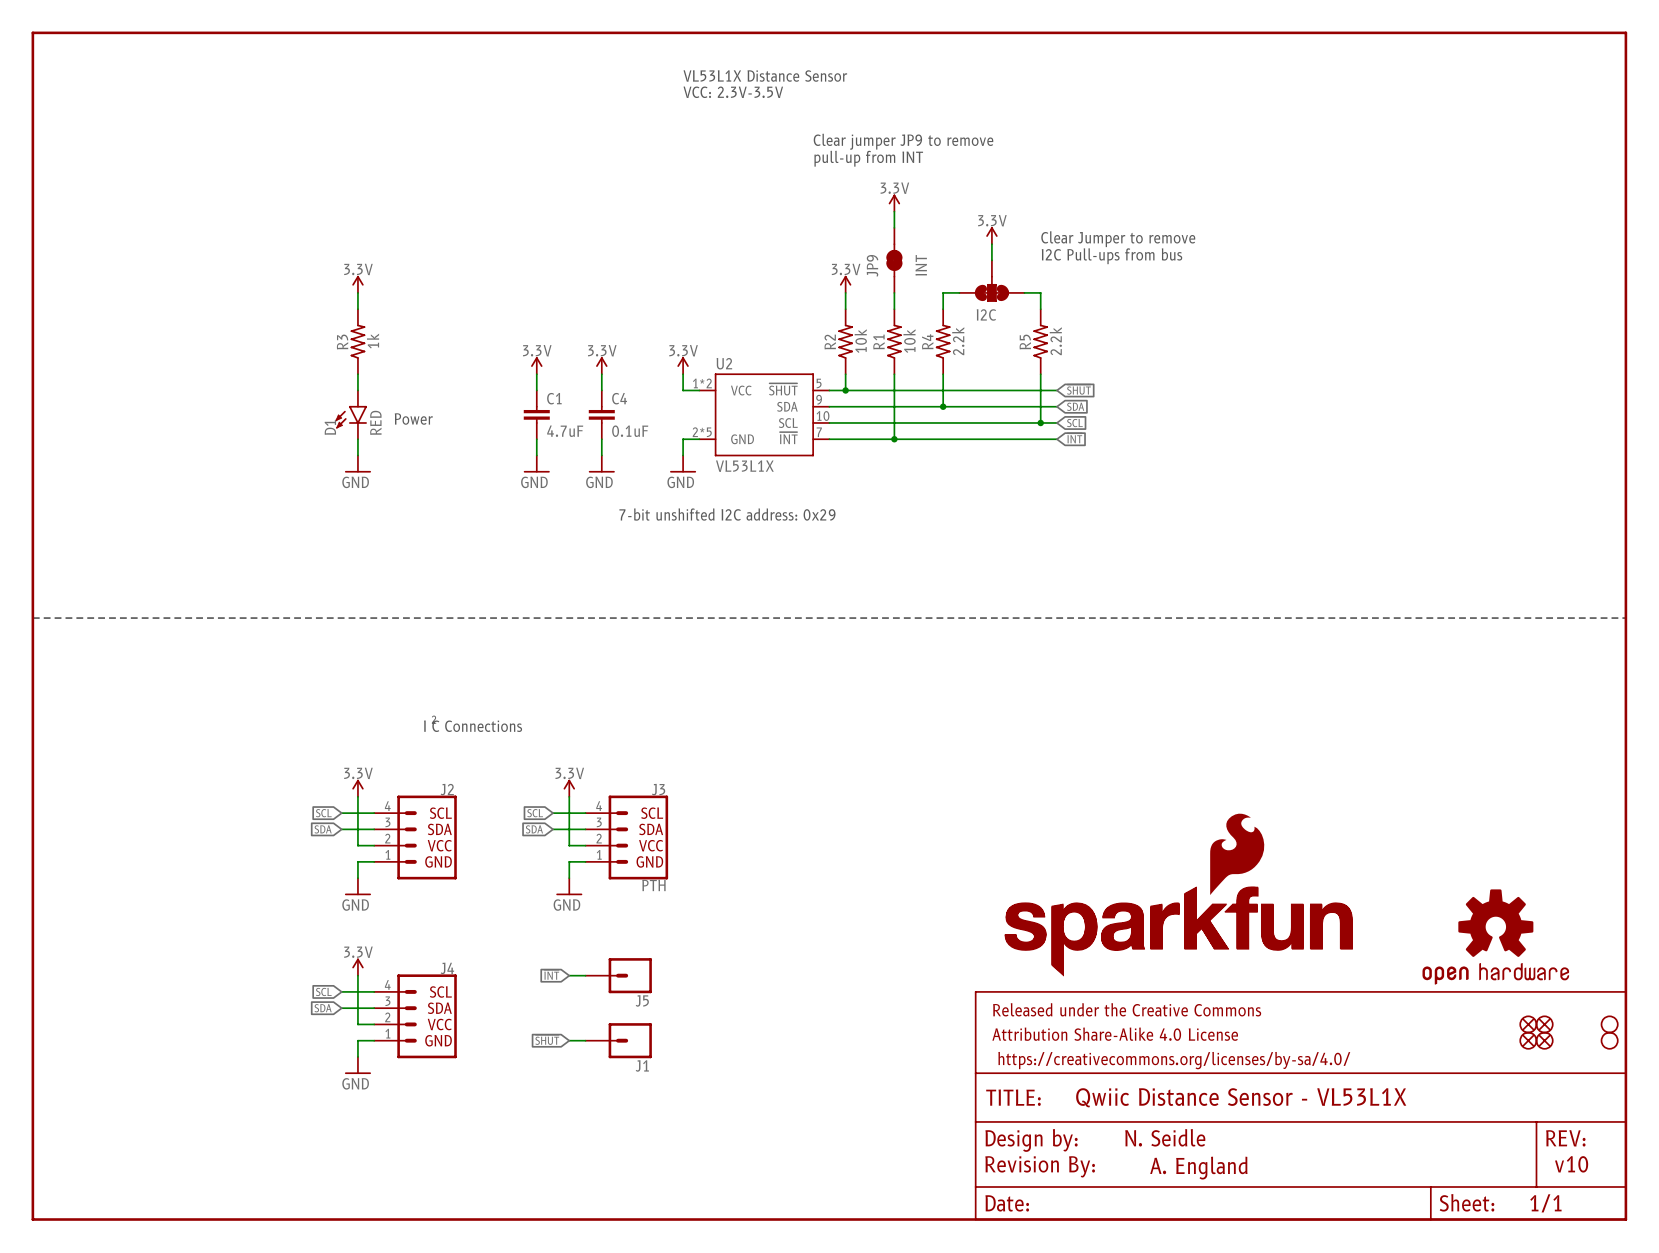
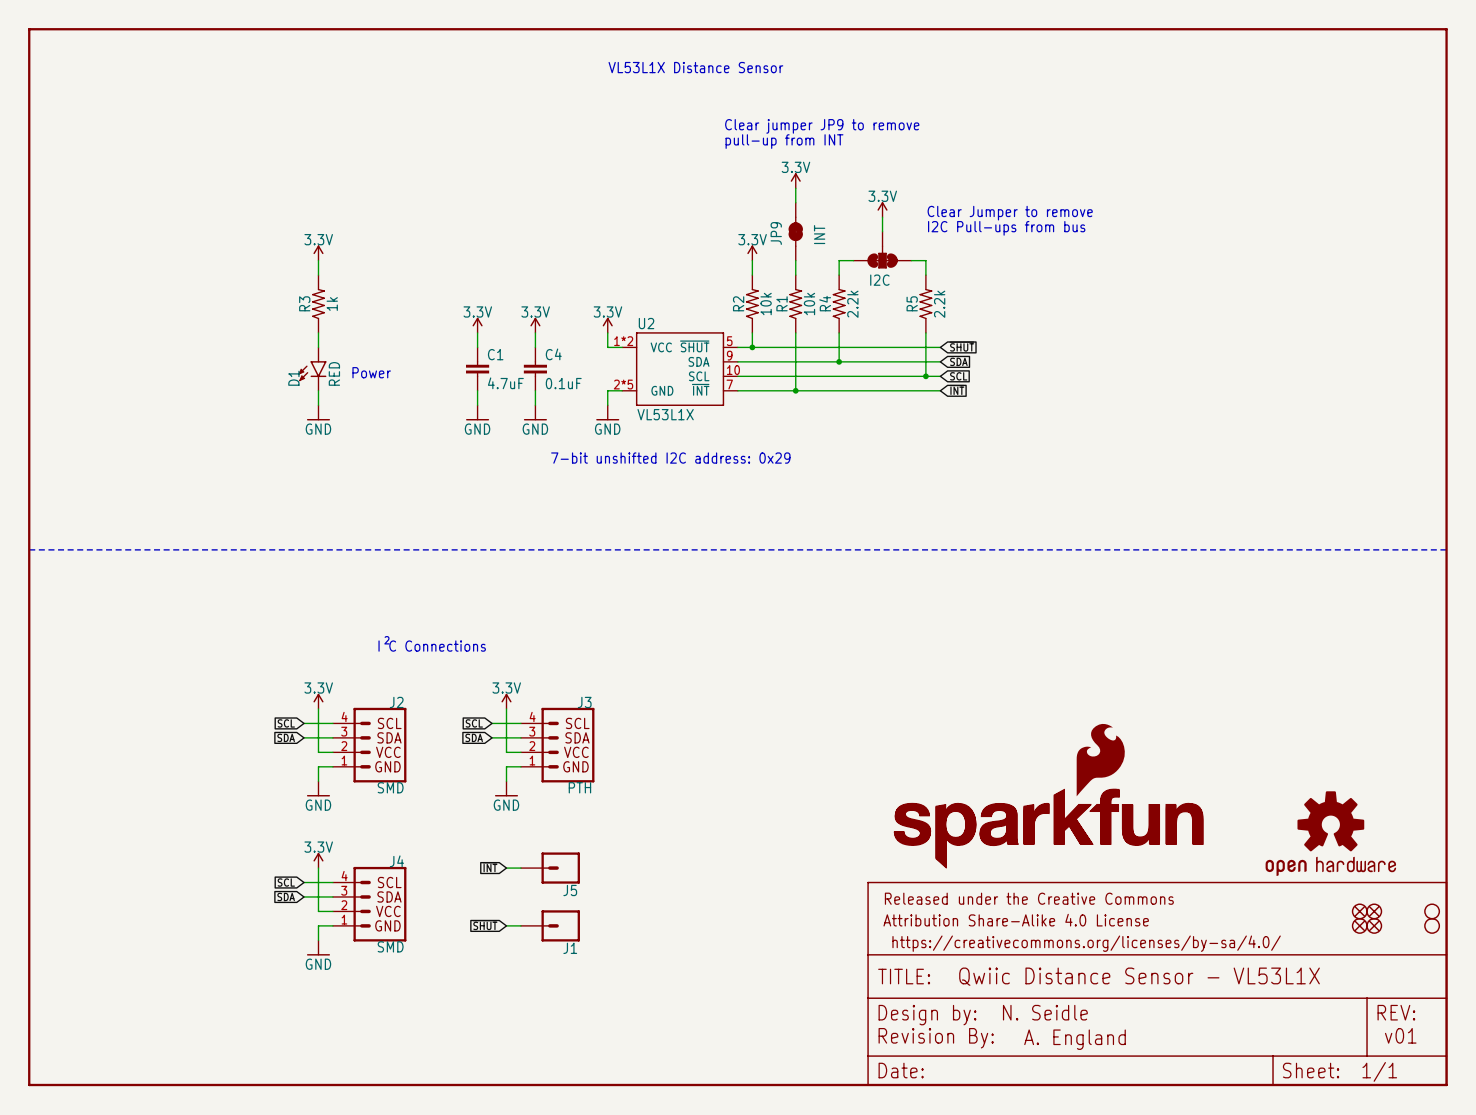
text: VCC: 2.3V-3.5V (733, 92) -> none
J2 value: none -> SMD (390, 787)
J4 value: none -> SMD (390, 946)
text: v10 (1571, 1164) -> v01 (1400, 1035)

